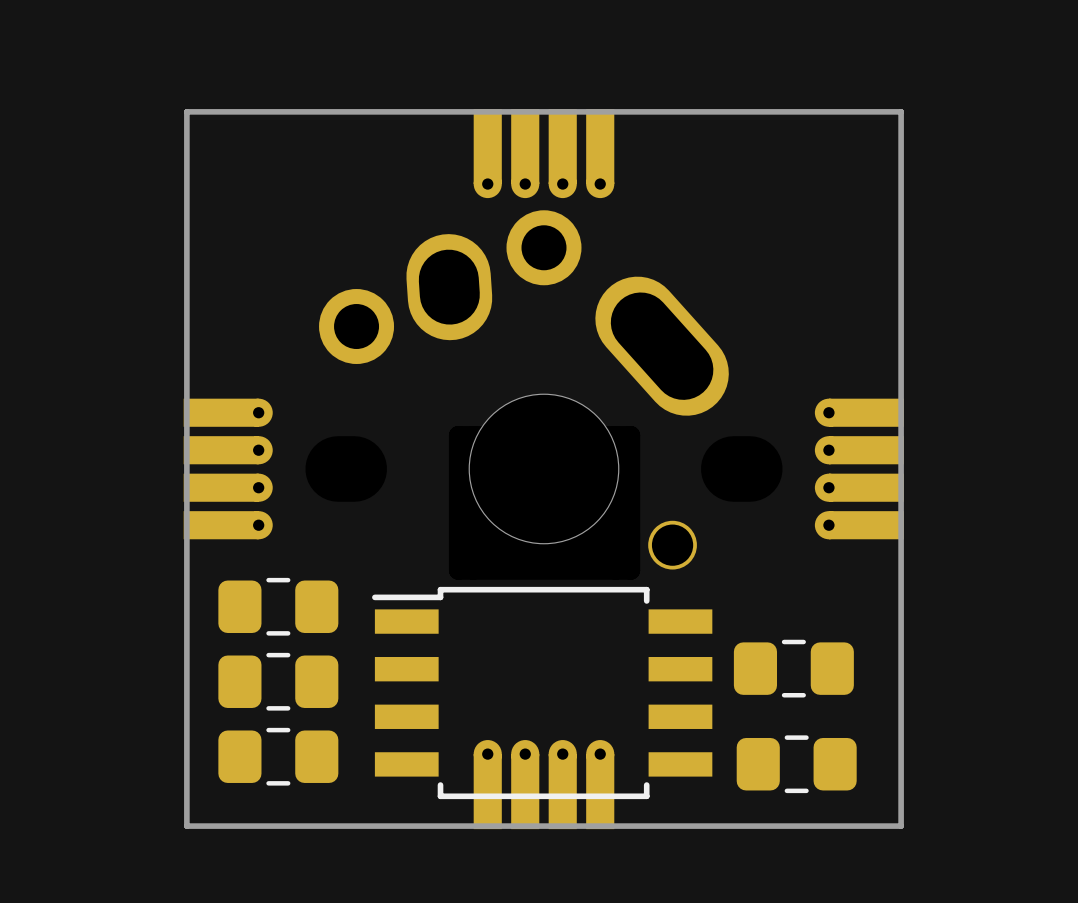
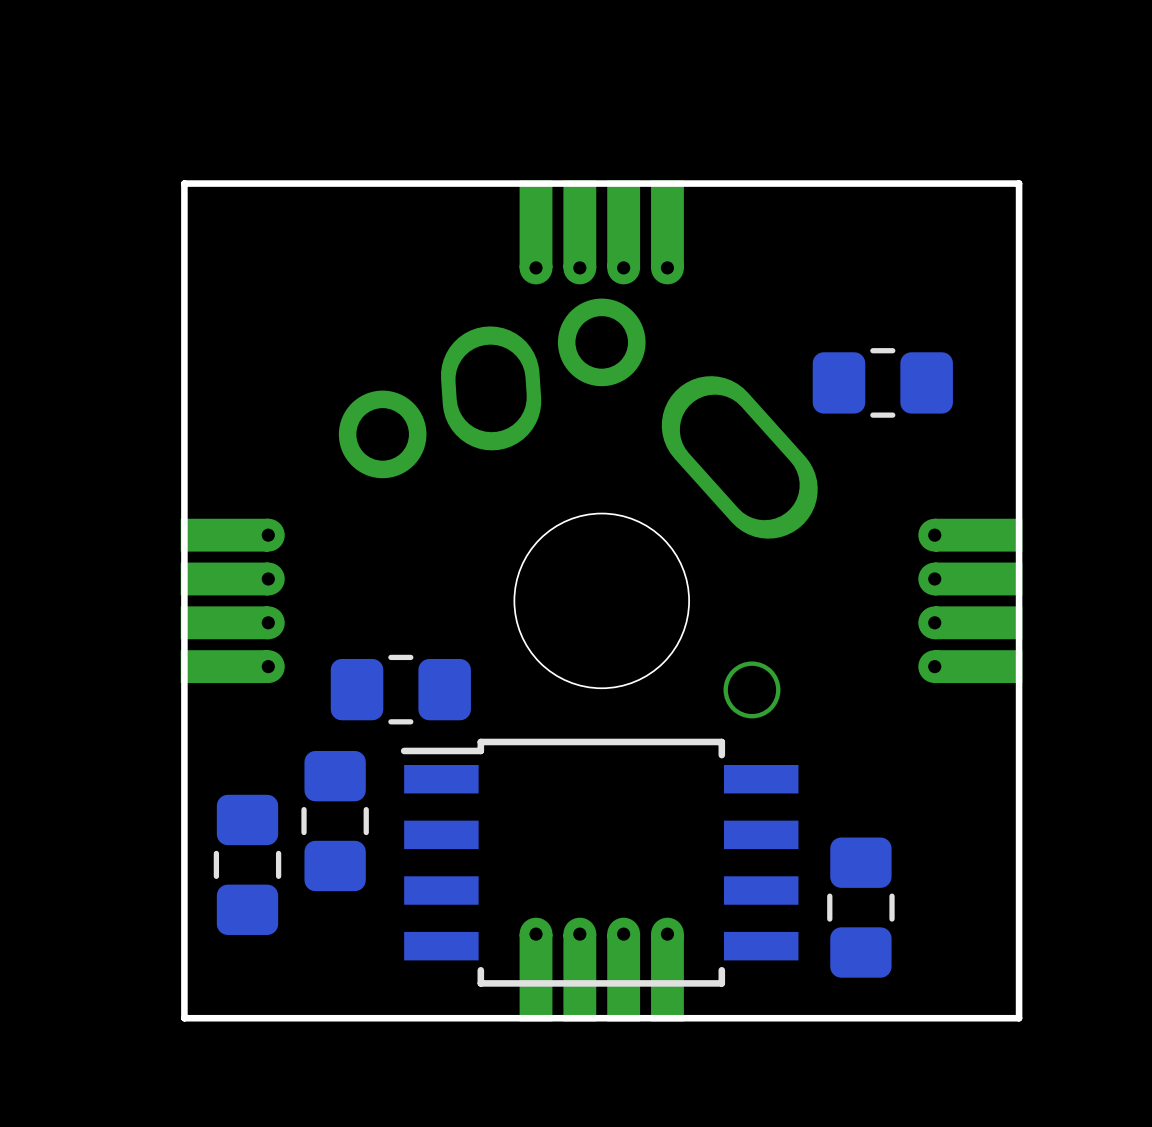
part: none -> (882, 382)
part: none -> (400, 689)
part: (278, 606) -> none
part: none -> (335, 821)
part: (793, 668) -> none
part: (278, 681) -> none
part: none -> (247, 864)
part: none -> (860, 907)
part: (278, 756) -> none
part: (796, 764) -> none

